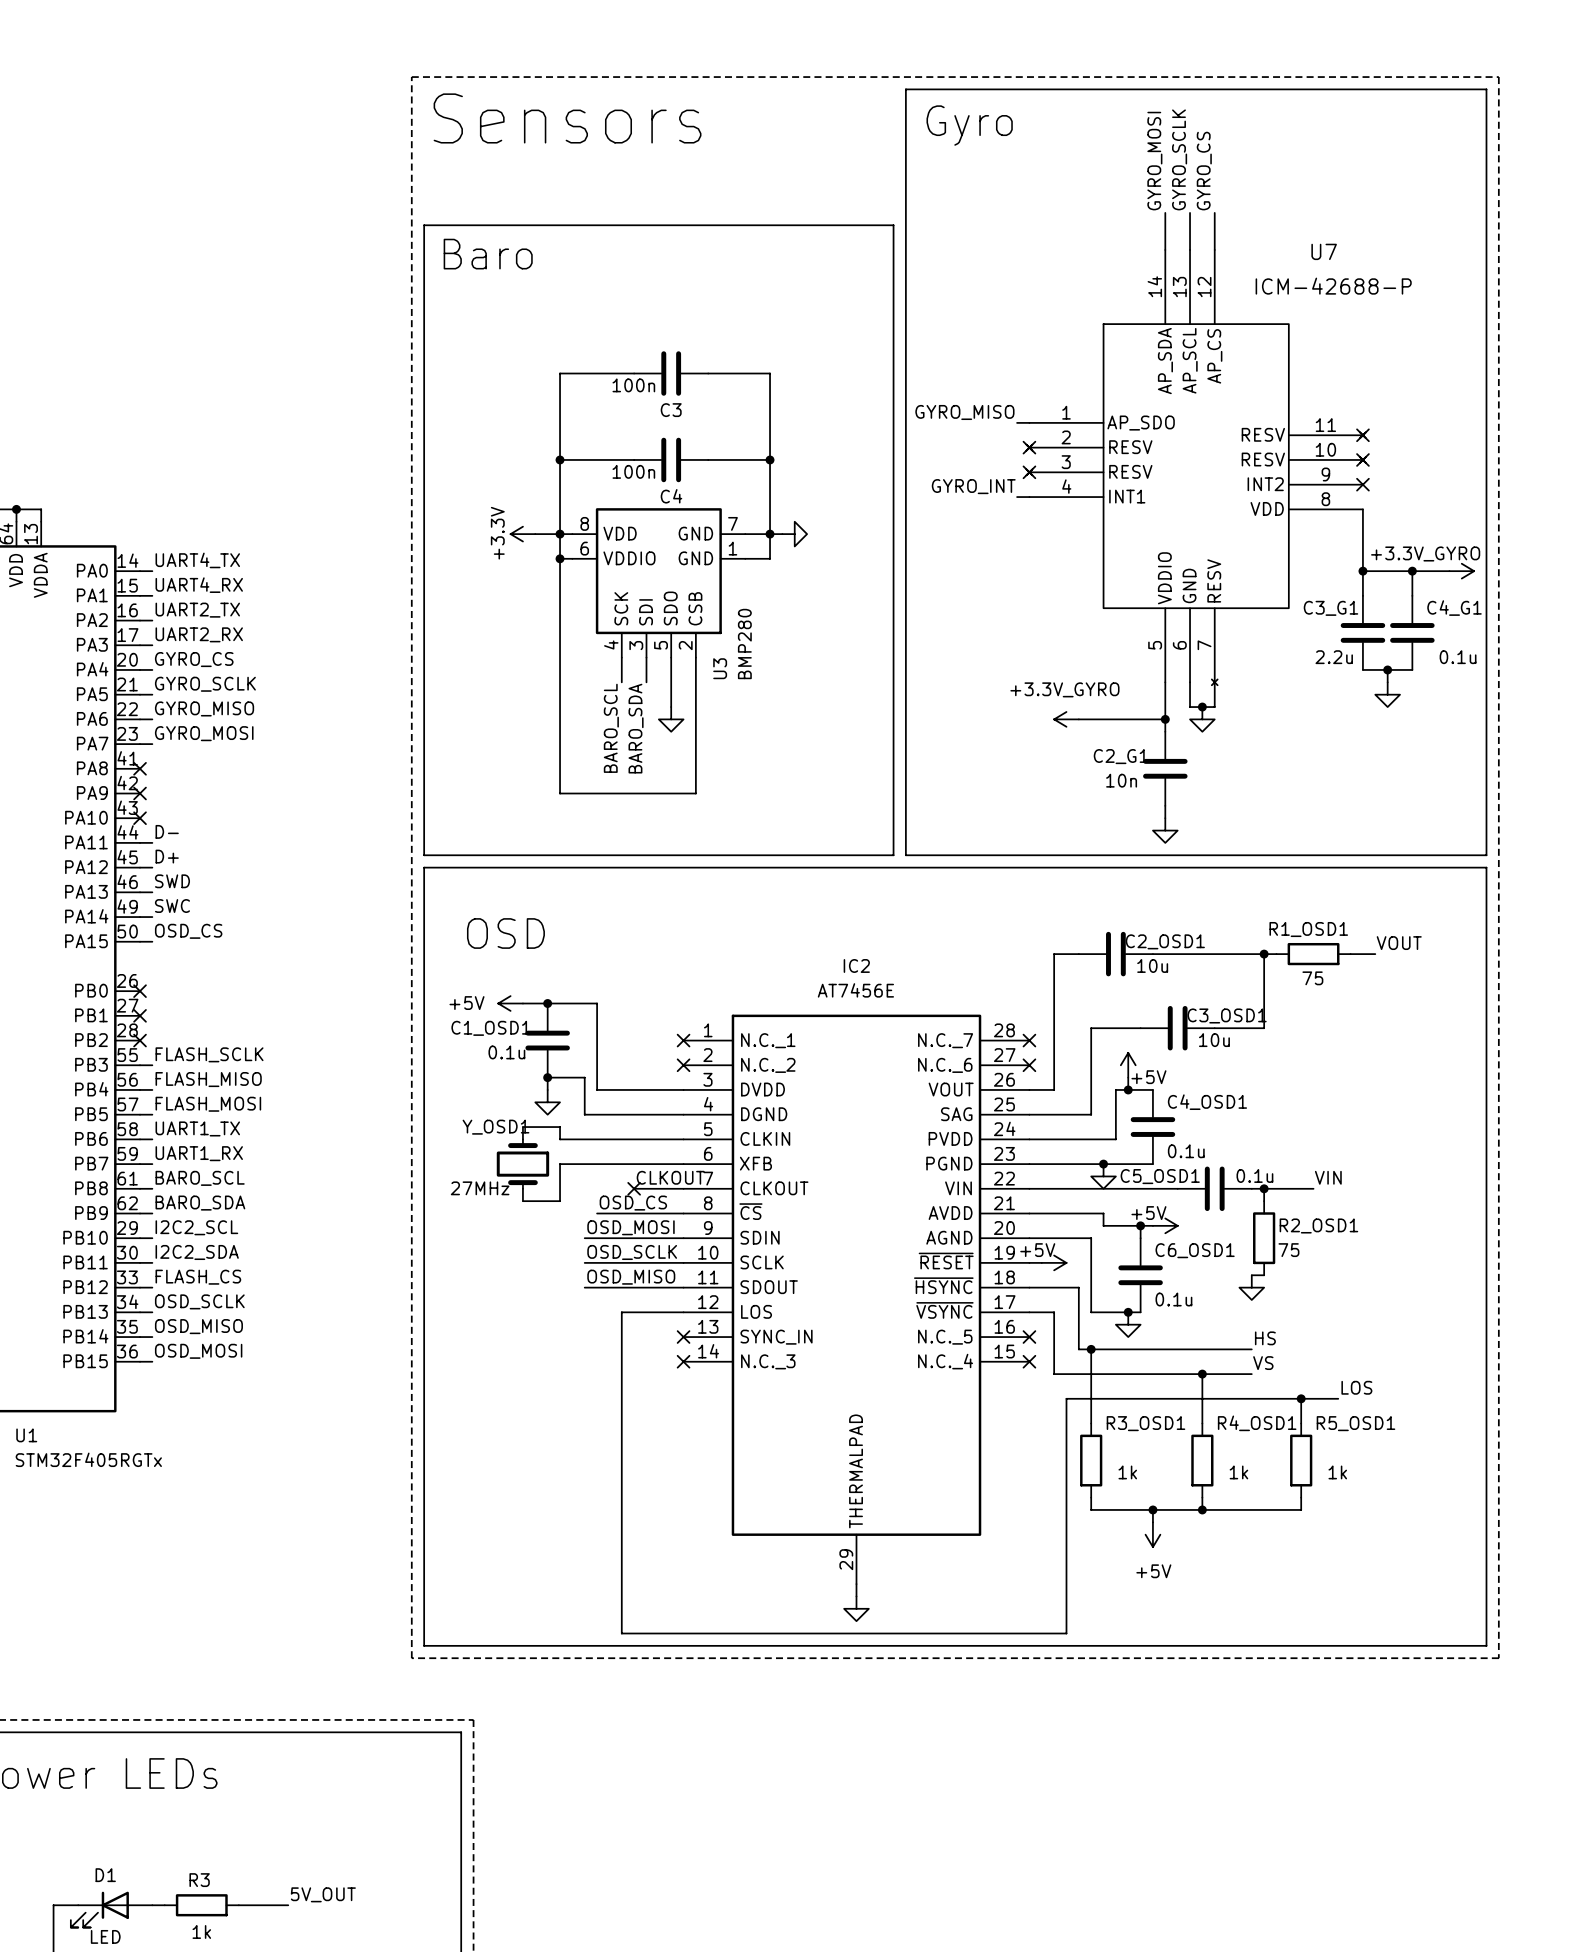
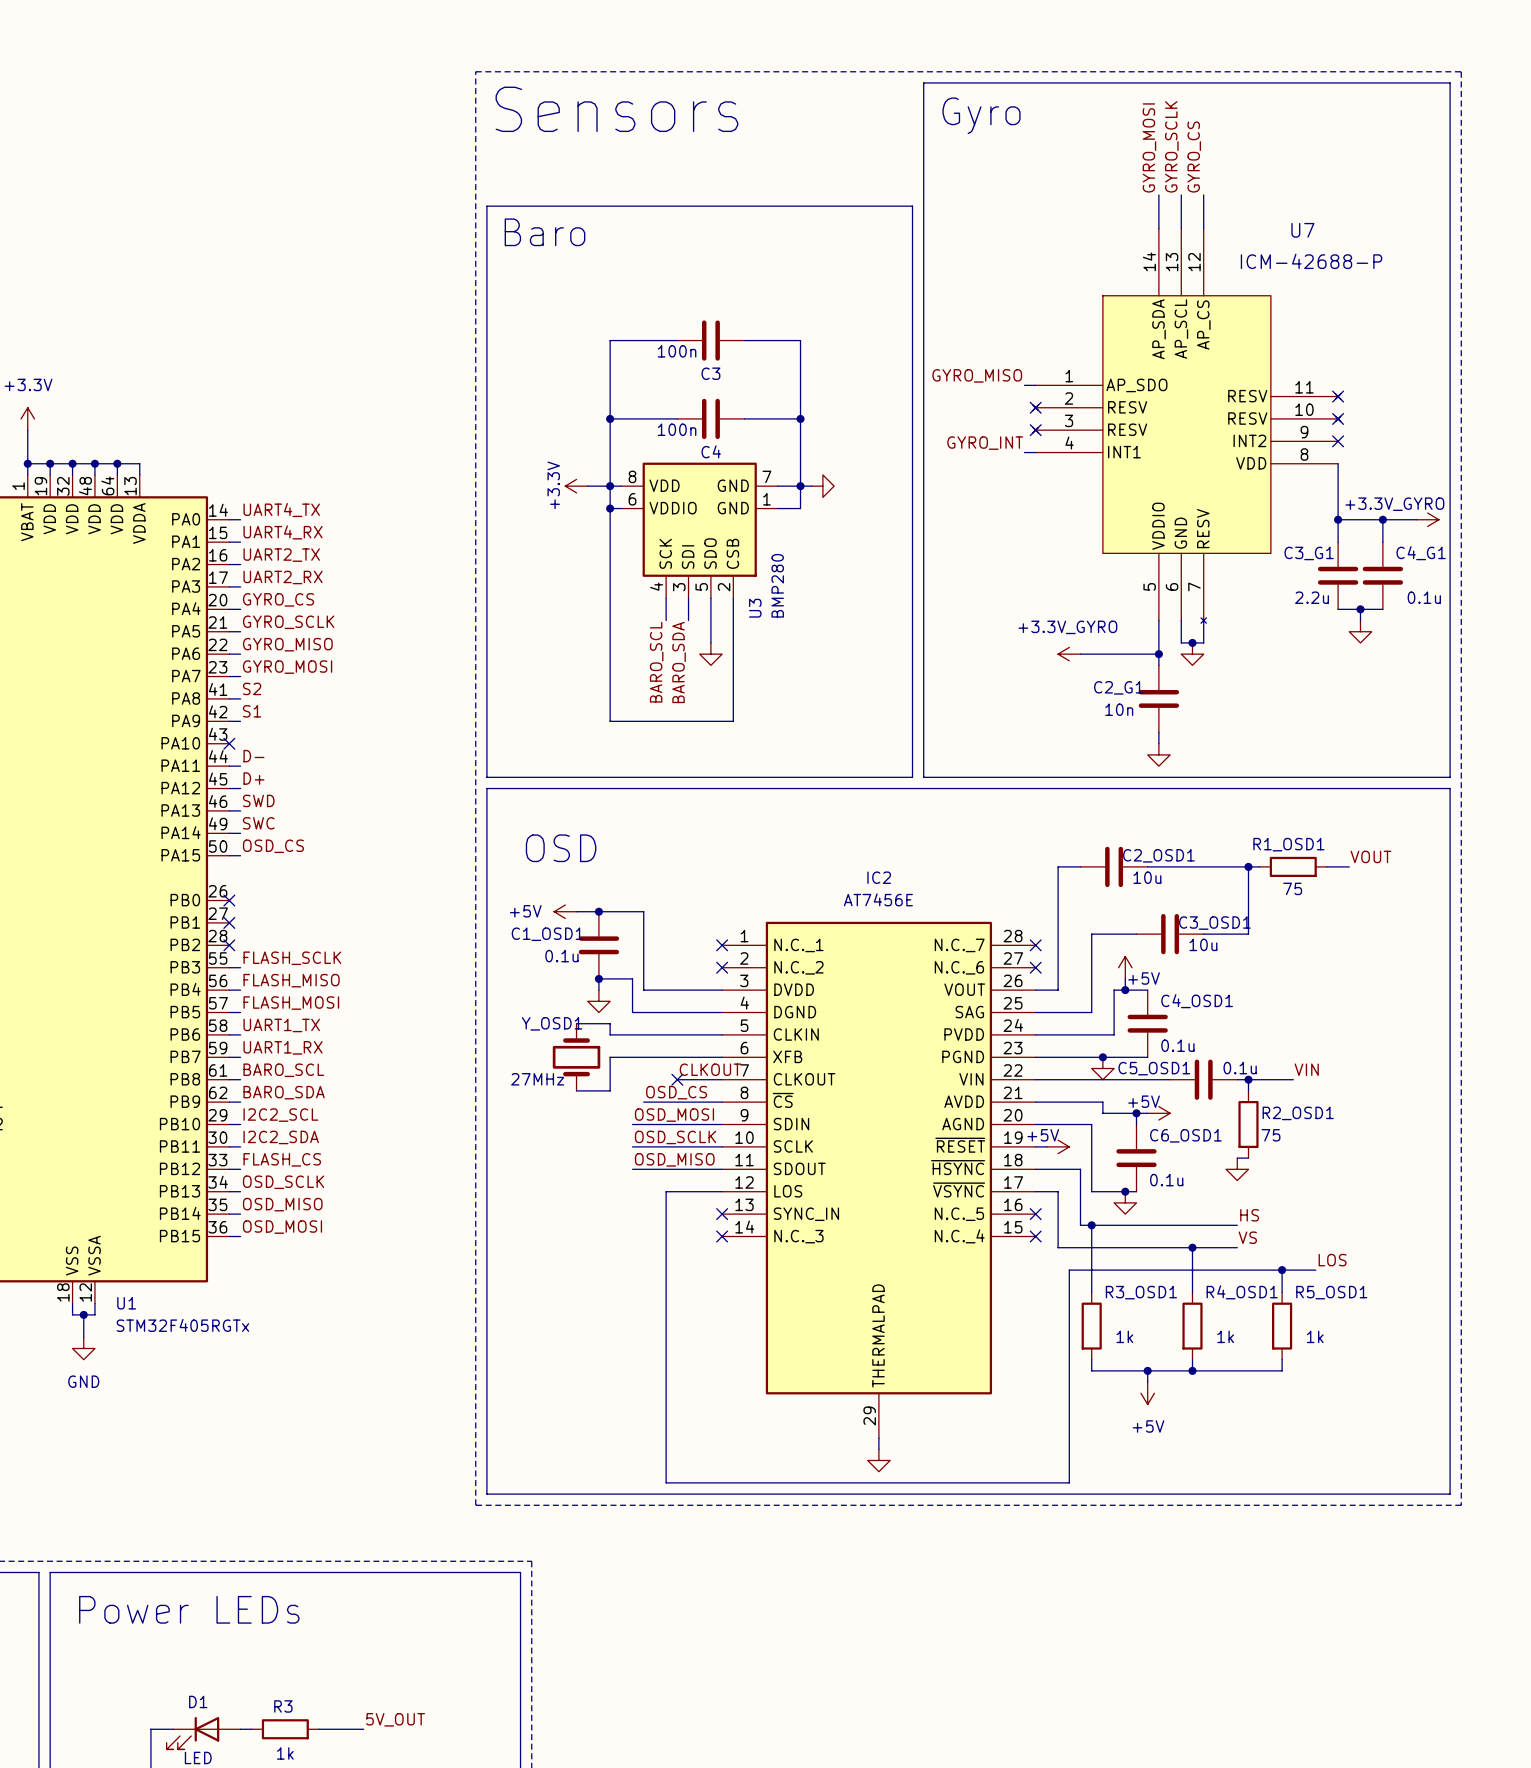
label: none -> S2 (252, 688)
wire: none -> (229, 698) (240, 698)
no-connect mark: (140, 768) -> none
label: none -> S1 (252, 711)
wire: none -> (229, 721) (240, 721)
no-connect mark: (140, 793) -> none

